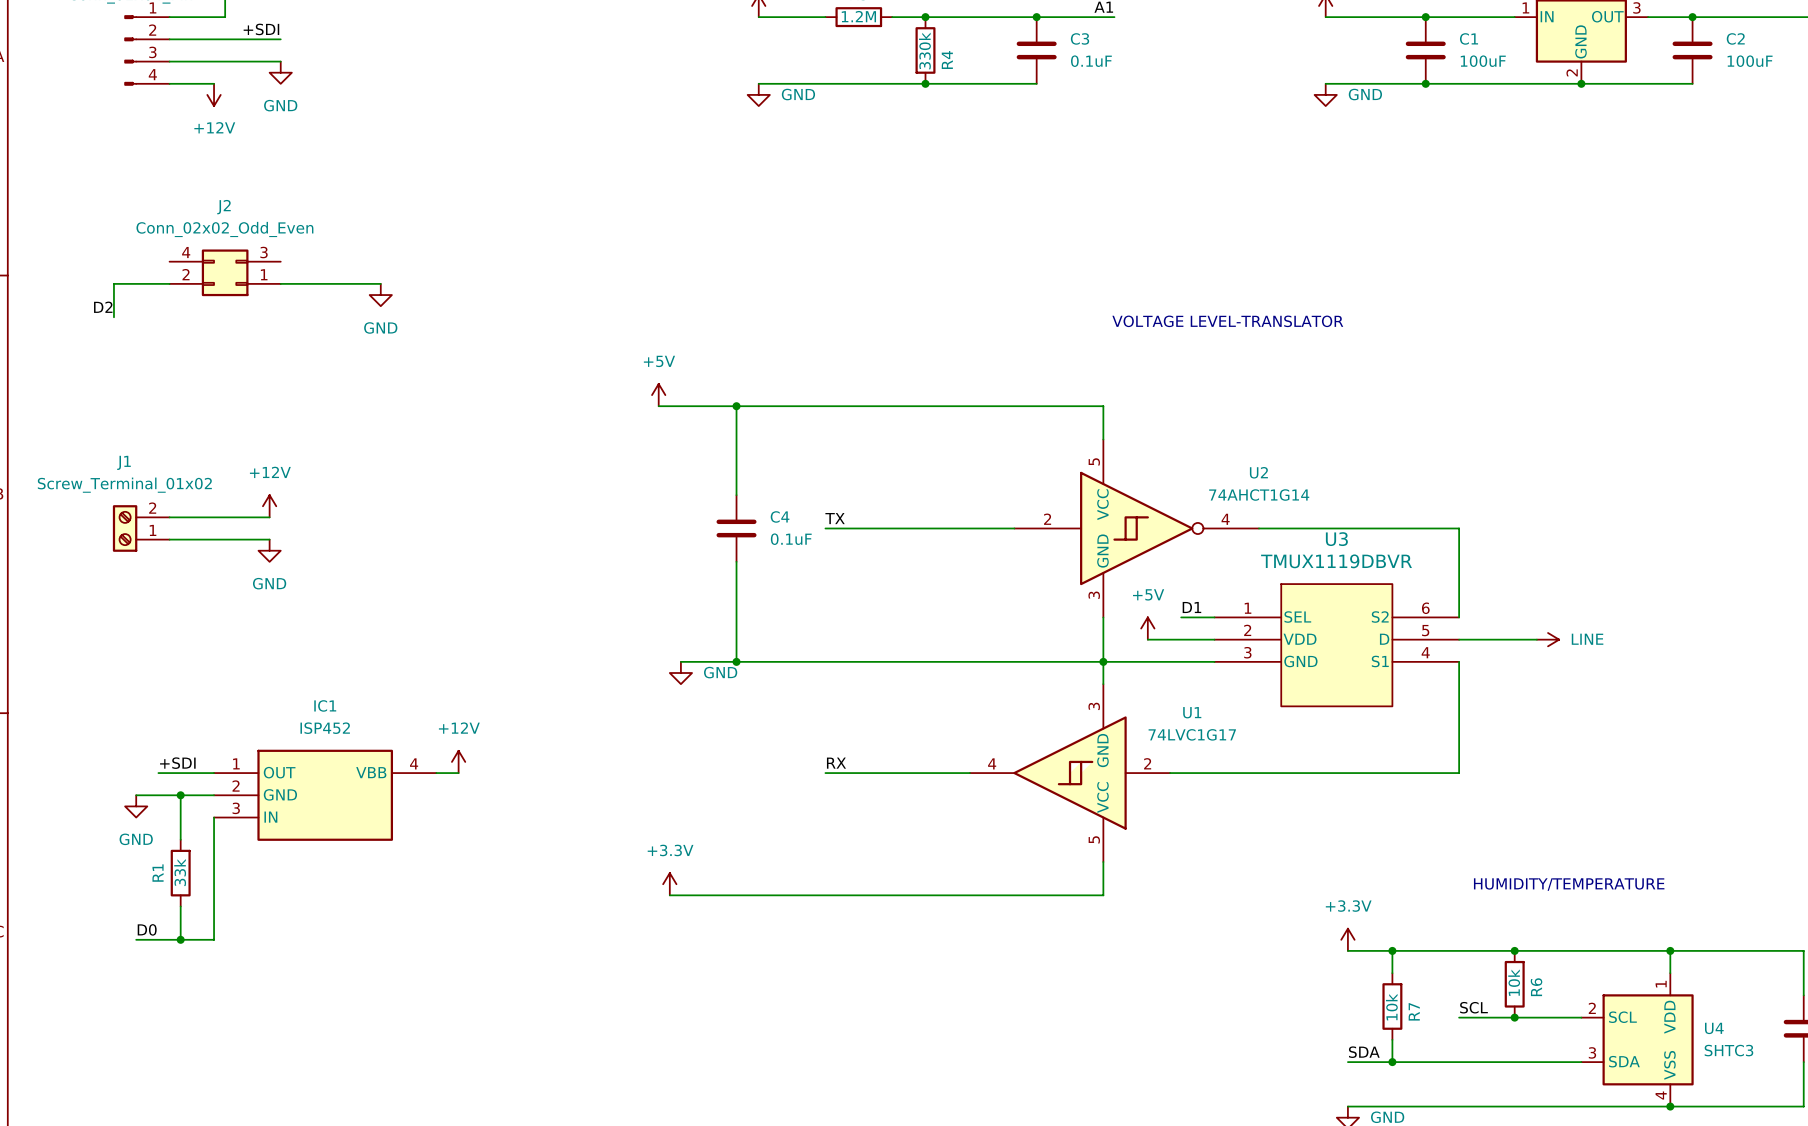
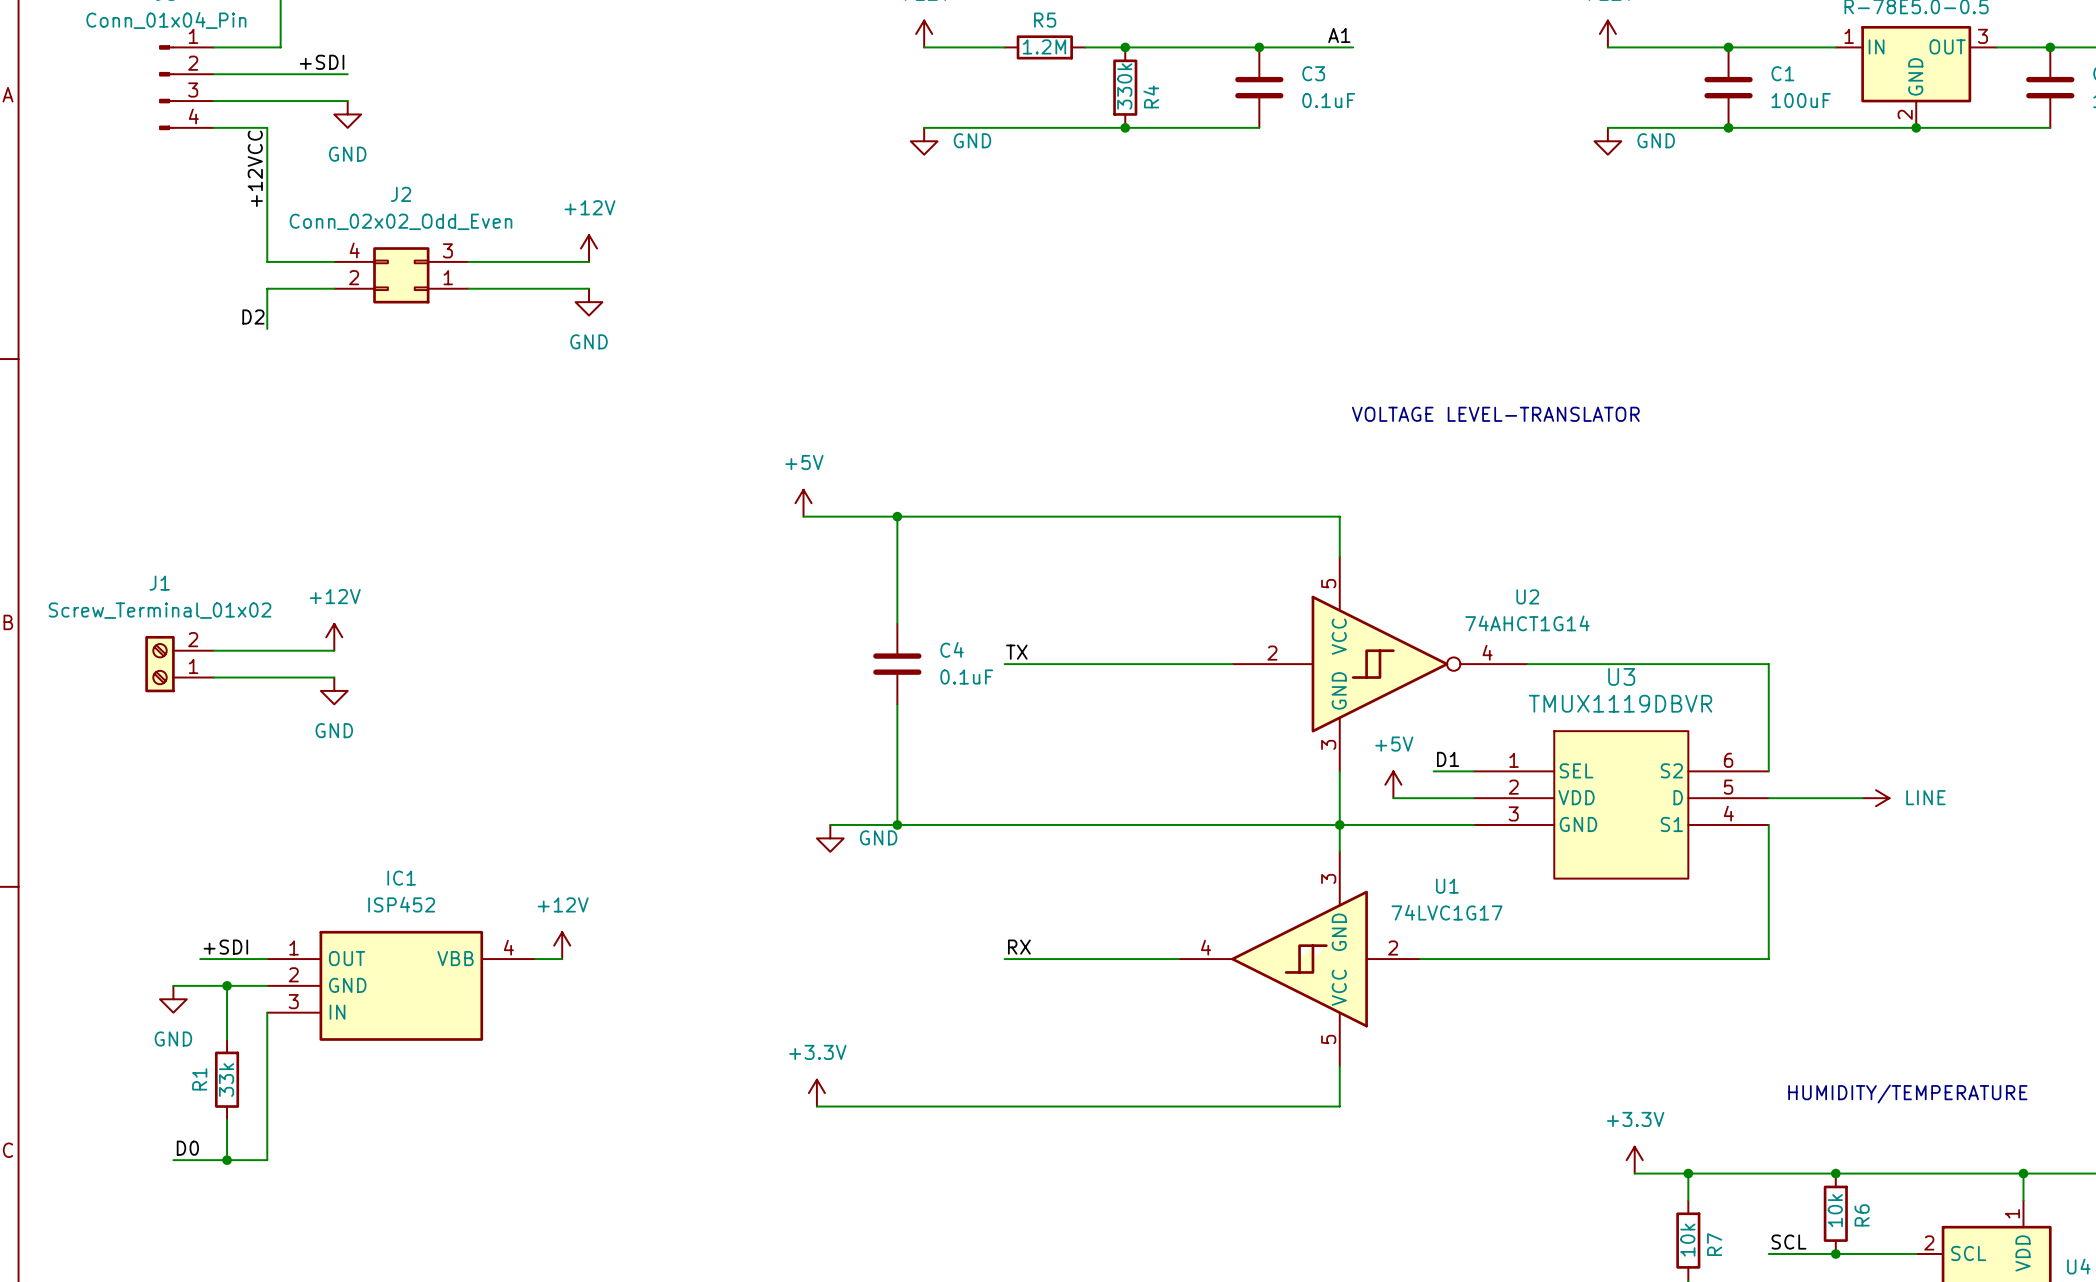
wire: none -> (267, 127) (267, 261) (334, 261)
power symbol: +12V (214, 94) -> none
label: none -> +12VCC (255, 168)
power symbol: none -> +12V (589, 248)
wire: none -> (468, 261) (589, 261)
J2 position: (225, 272) -> (401, 275)
wire: (169, 283) (113, 283) (113, 317) -> (334, 288) (267, 288) (267, 328)
wire: (280, 283) (380, 283) -> (468, 288) (589, 288)
power symbol position: GND (380, 295) -> GND (589, 302)
label position: D2 (103, 307) -> D2 (253, 316)

